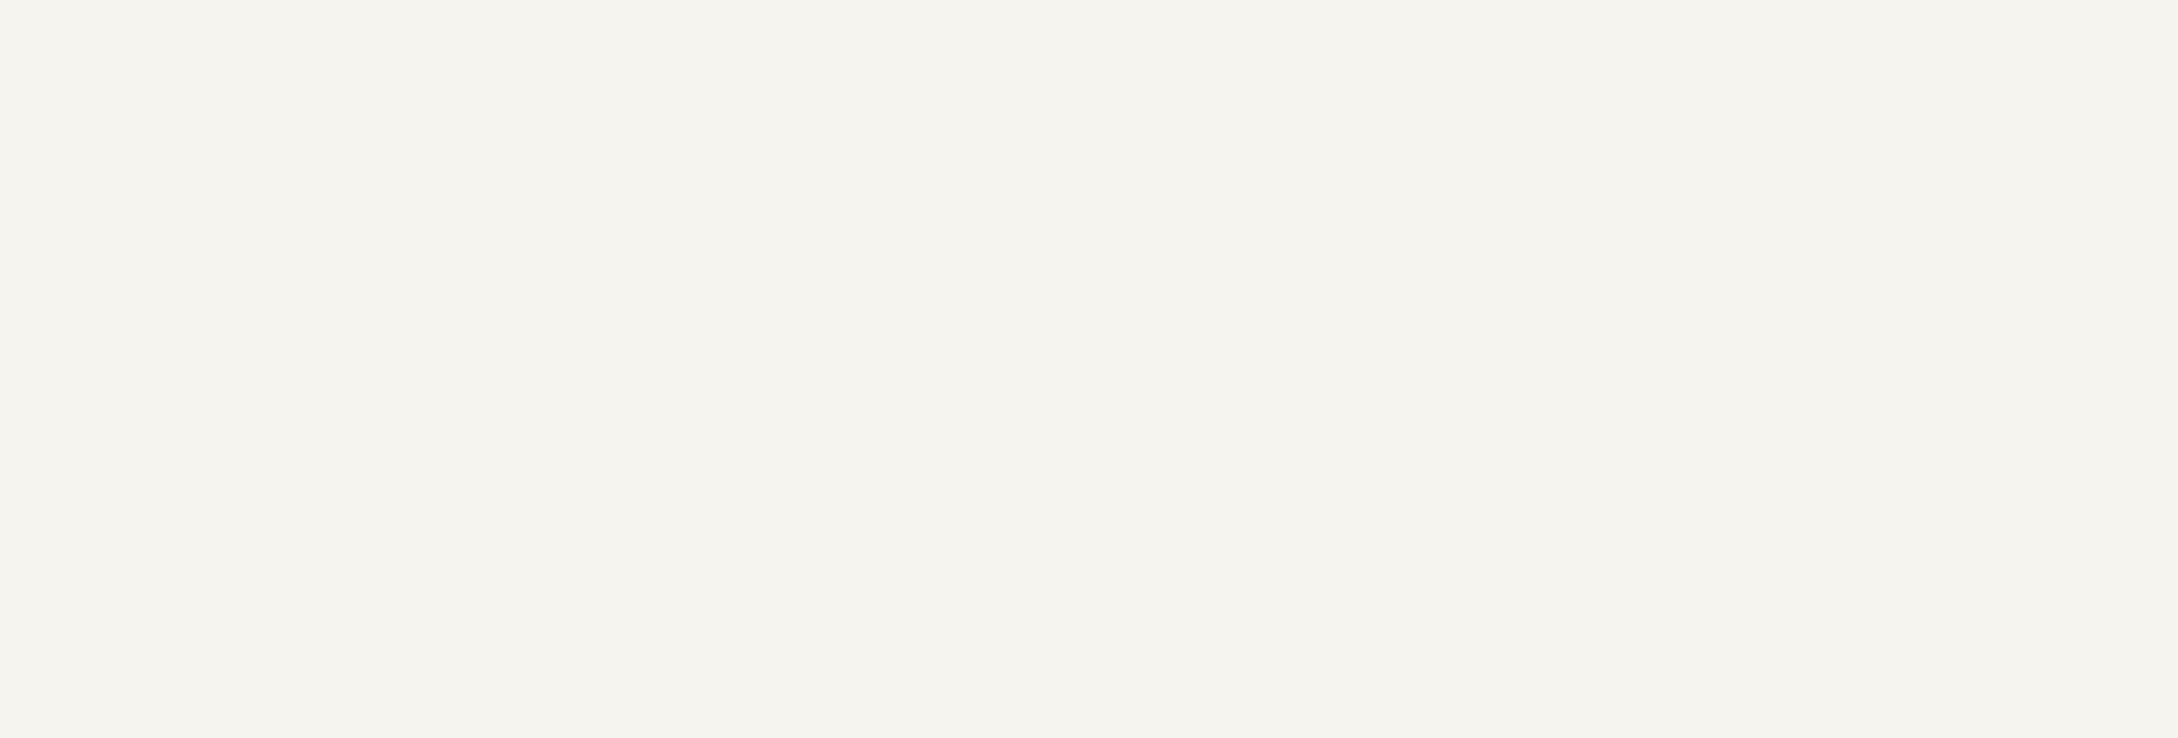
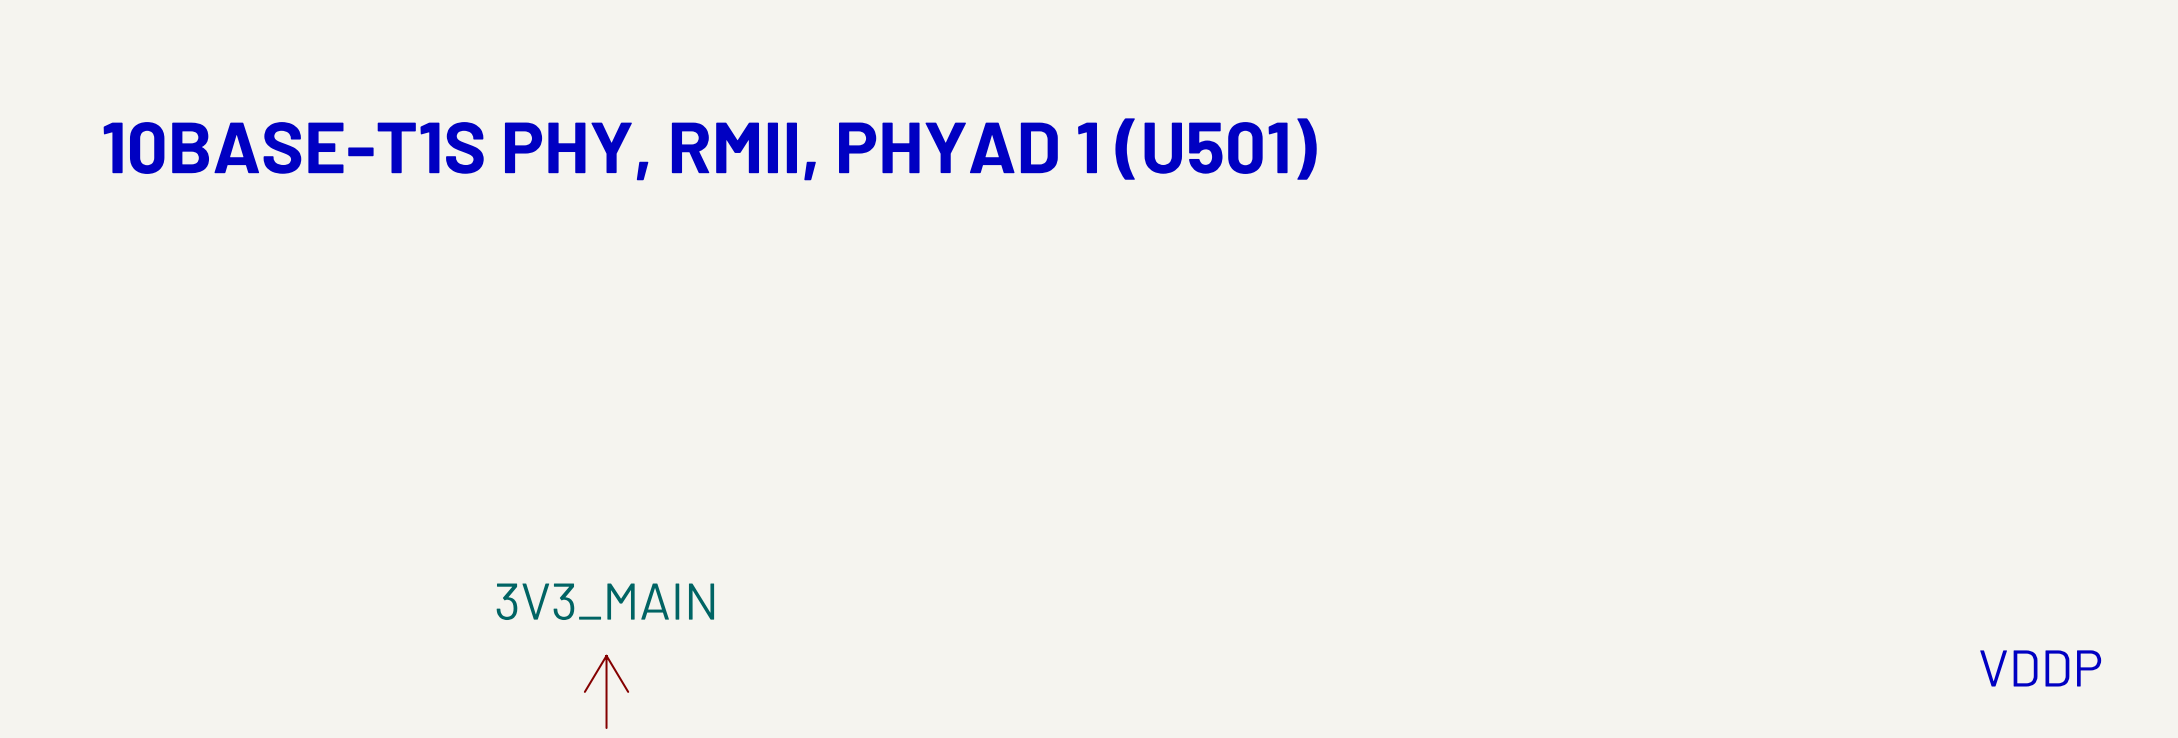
text: none -> 10BASE-T1S PHY, RMII, PHYAD 1 (U501) (710, 149)
text: none -> VDDP (2040, 668)
power symbol: none -> 3V3_MAIN (606, 691)

